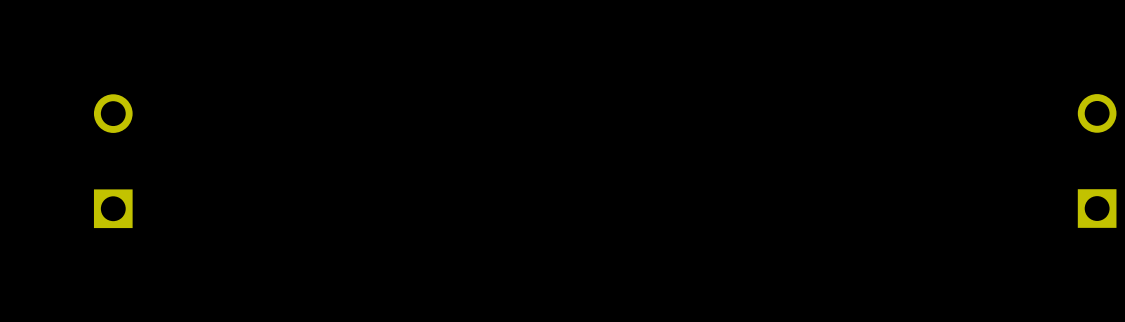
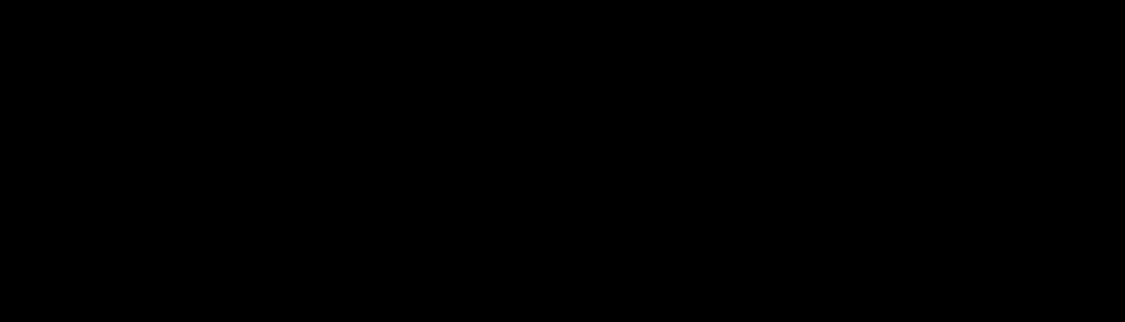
part: (1097, 160) -> none
part: (113, 161) -> none

